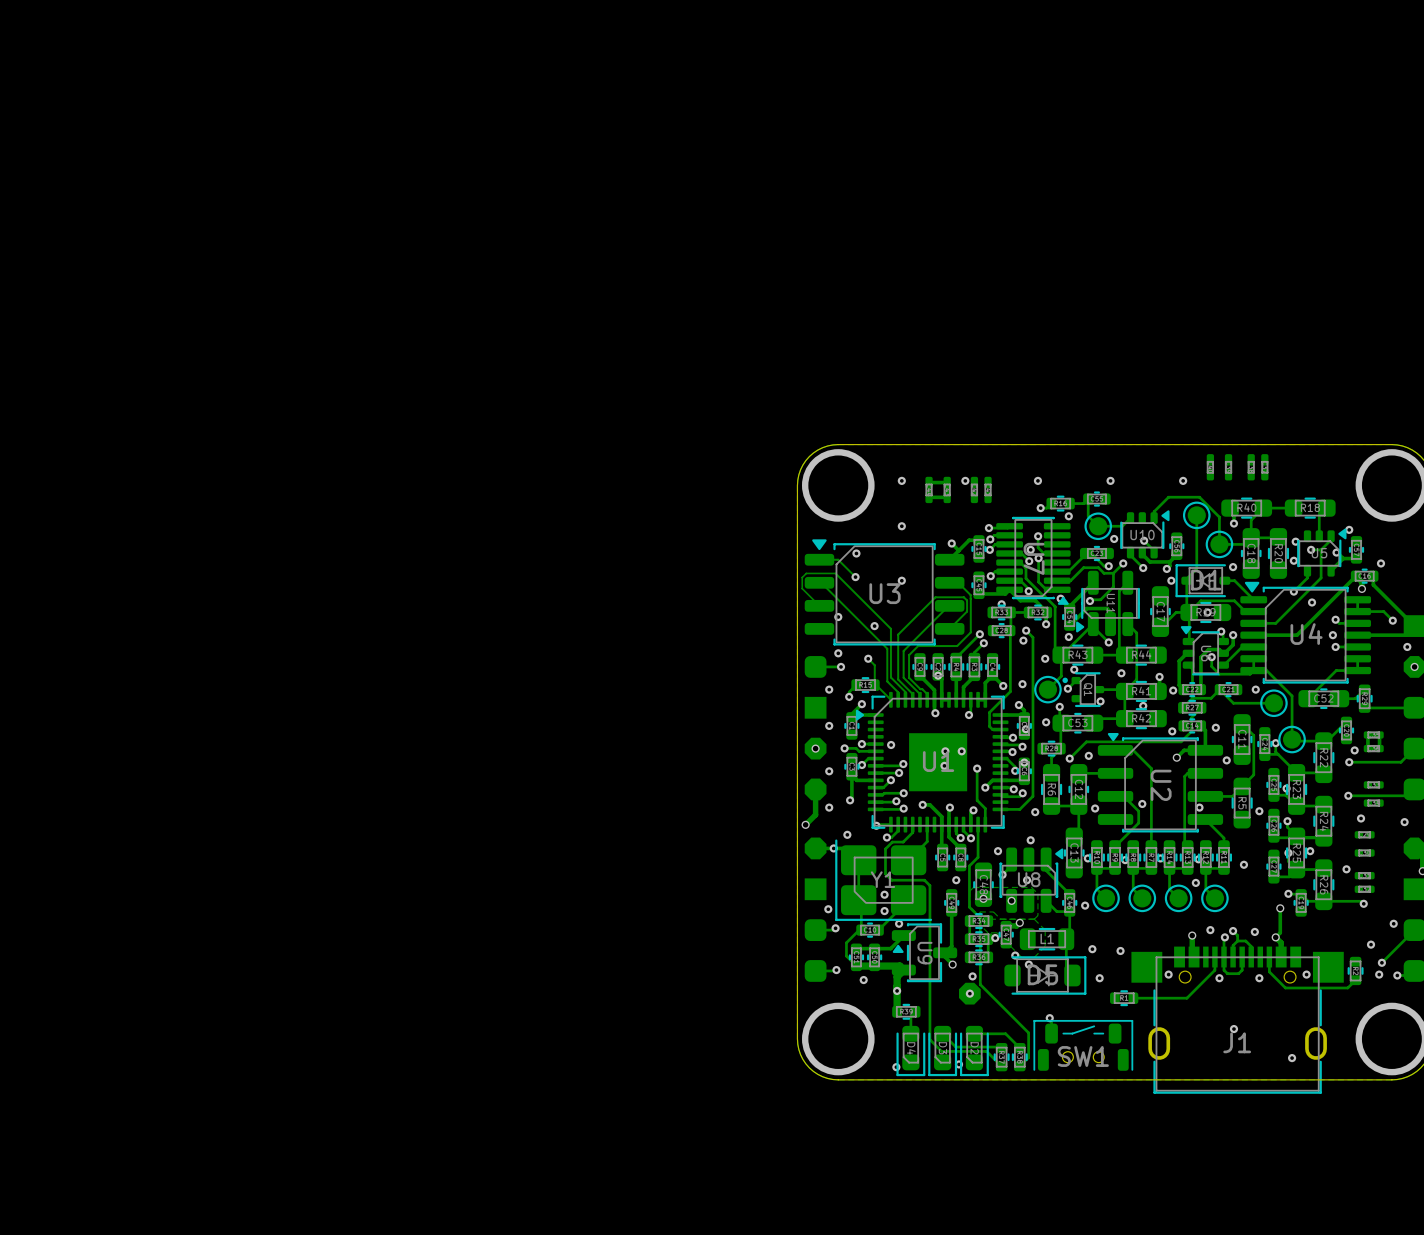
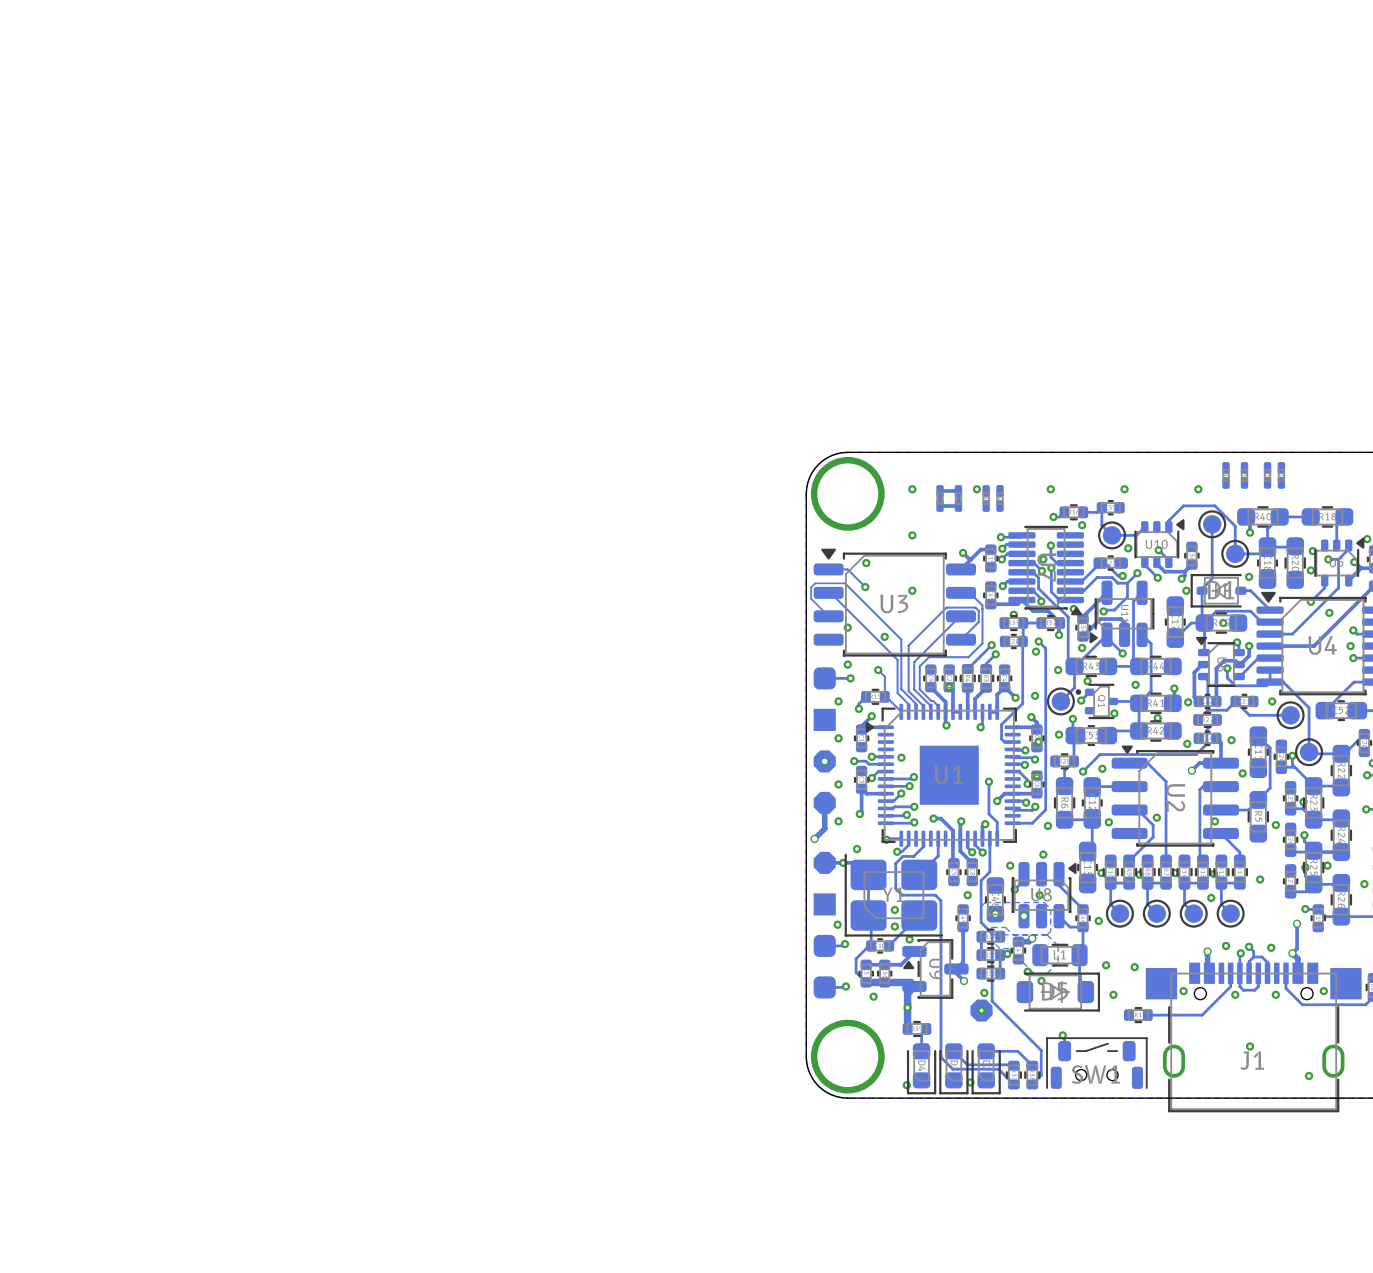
via: (945, 751) -> none
via: (961, 751) -> none
via: (944, 765) -> none

